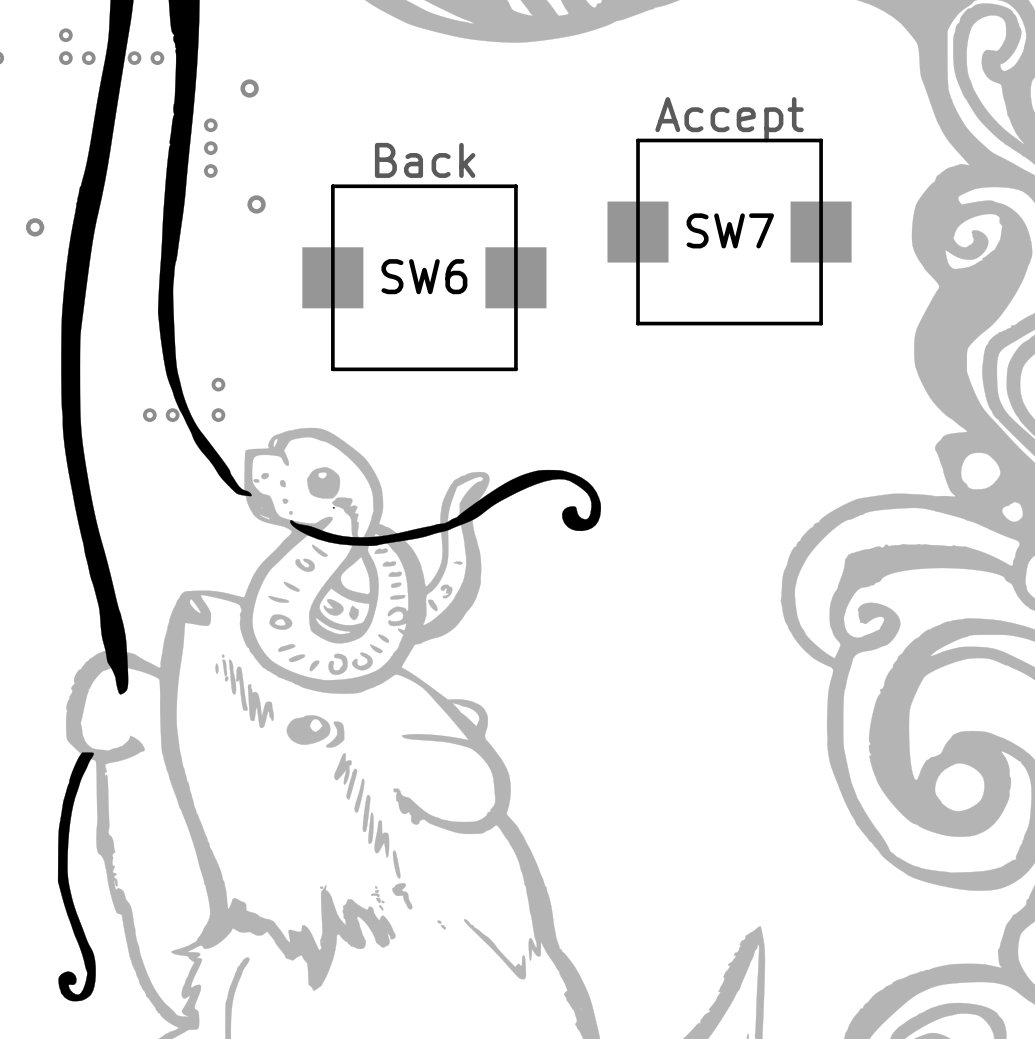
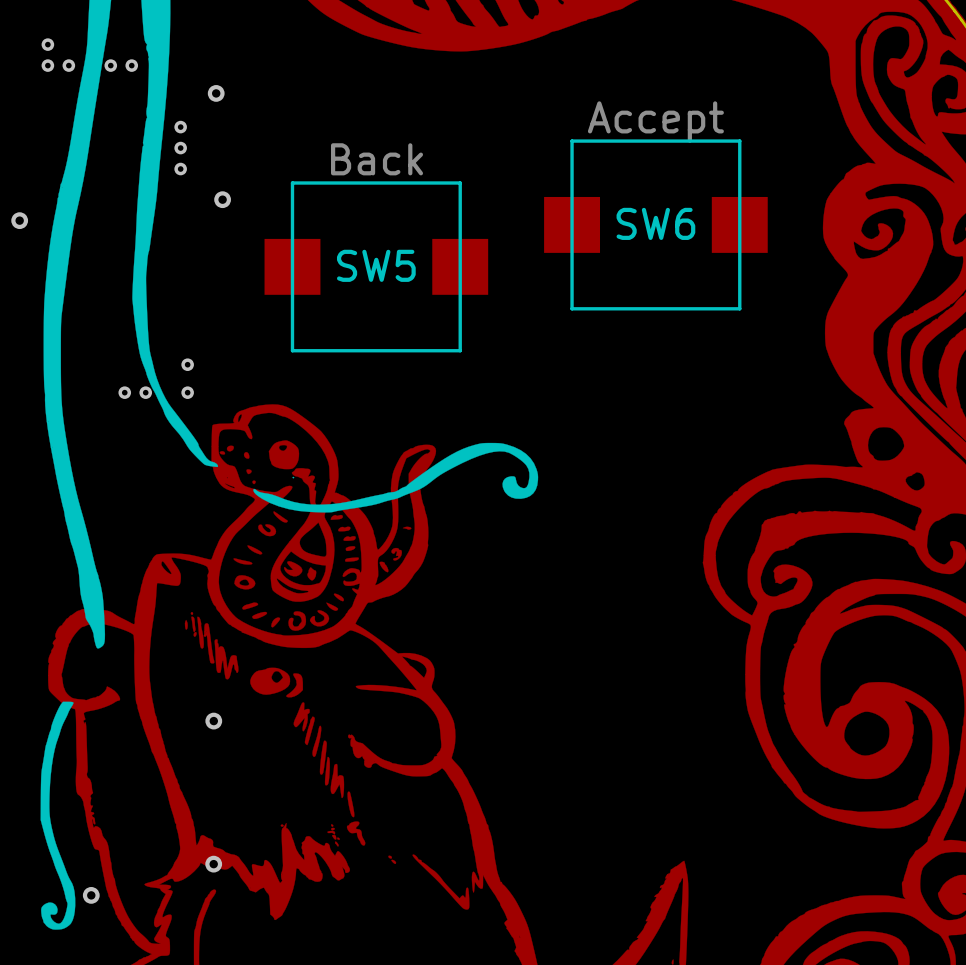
SW7 name: SW7 (730, 230) -> SW6 (655, 223)
SW6 name: SW6 (424, 276) -> SW5 (376, 265)
via: none -> (213, 721)
via: none -> (213, 864)
via: none -> (91, 895)

